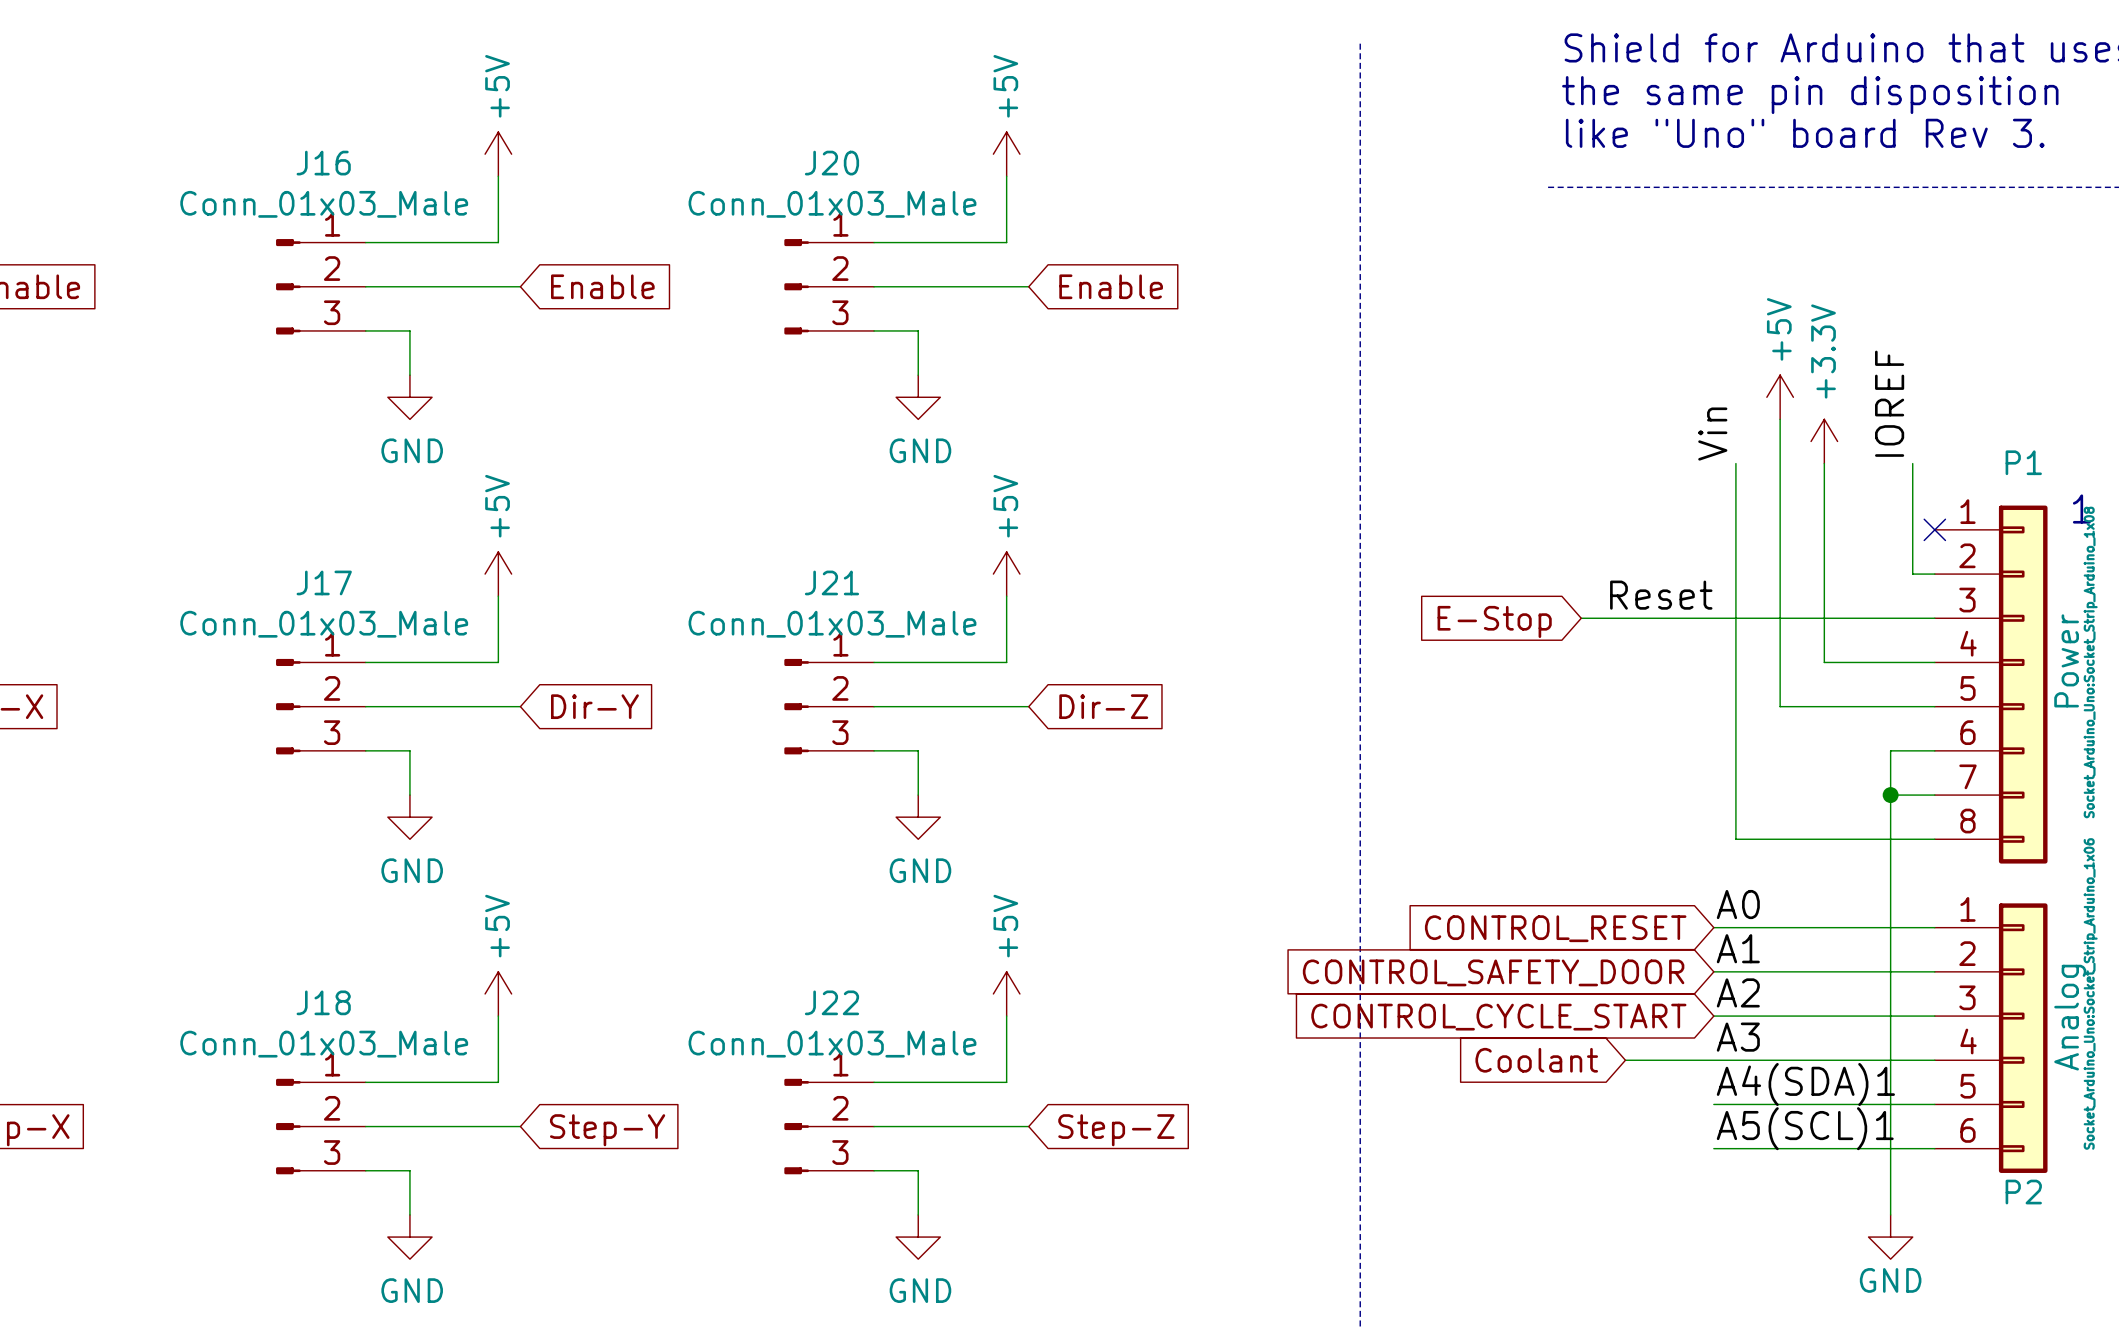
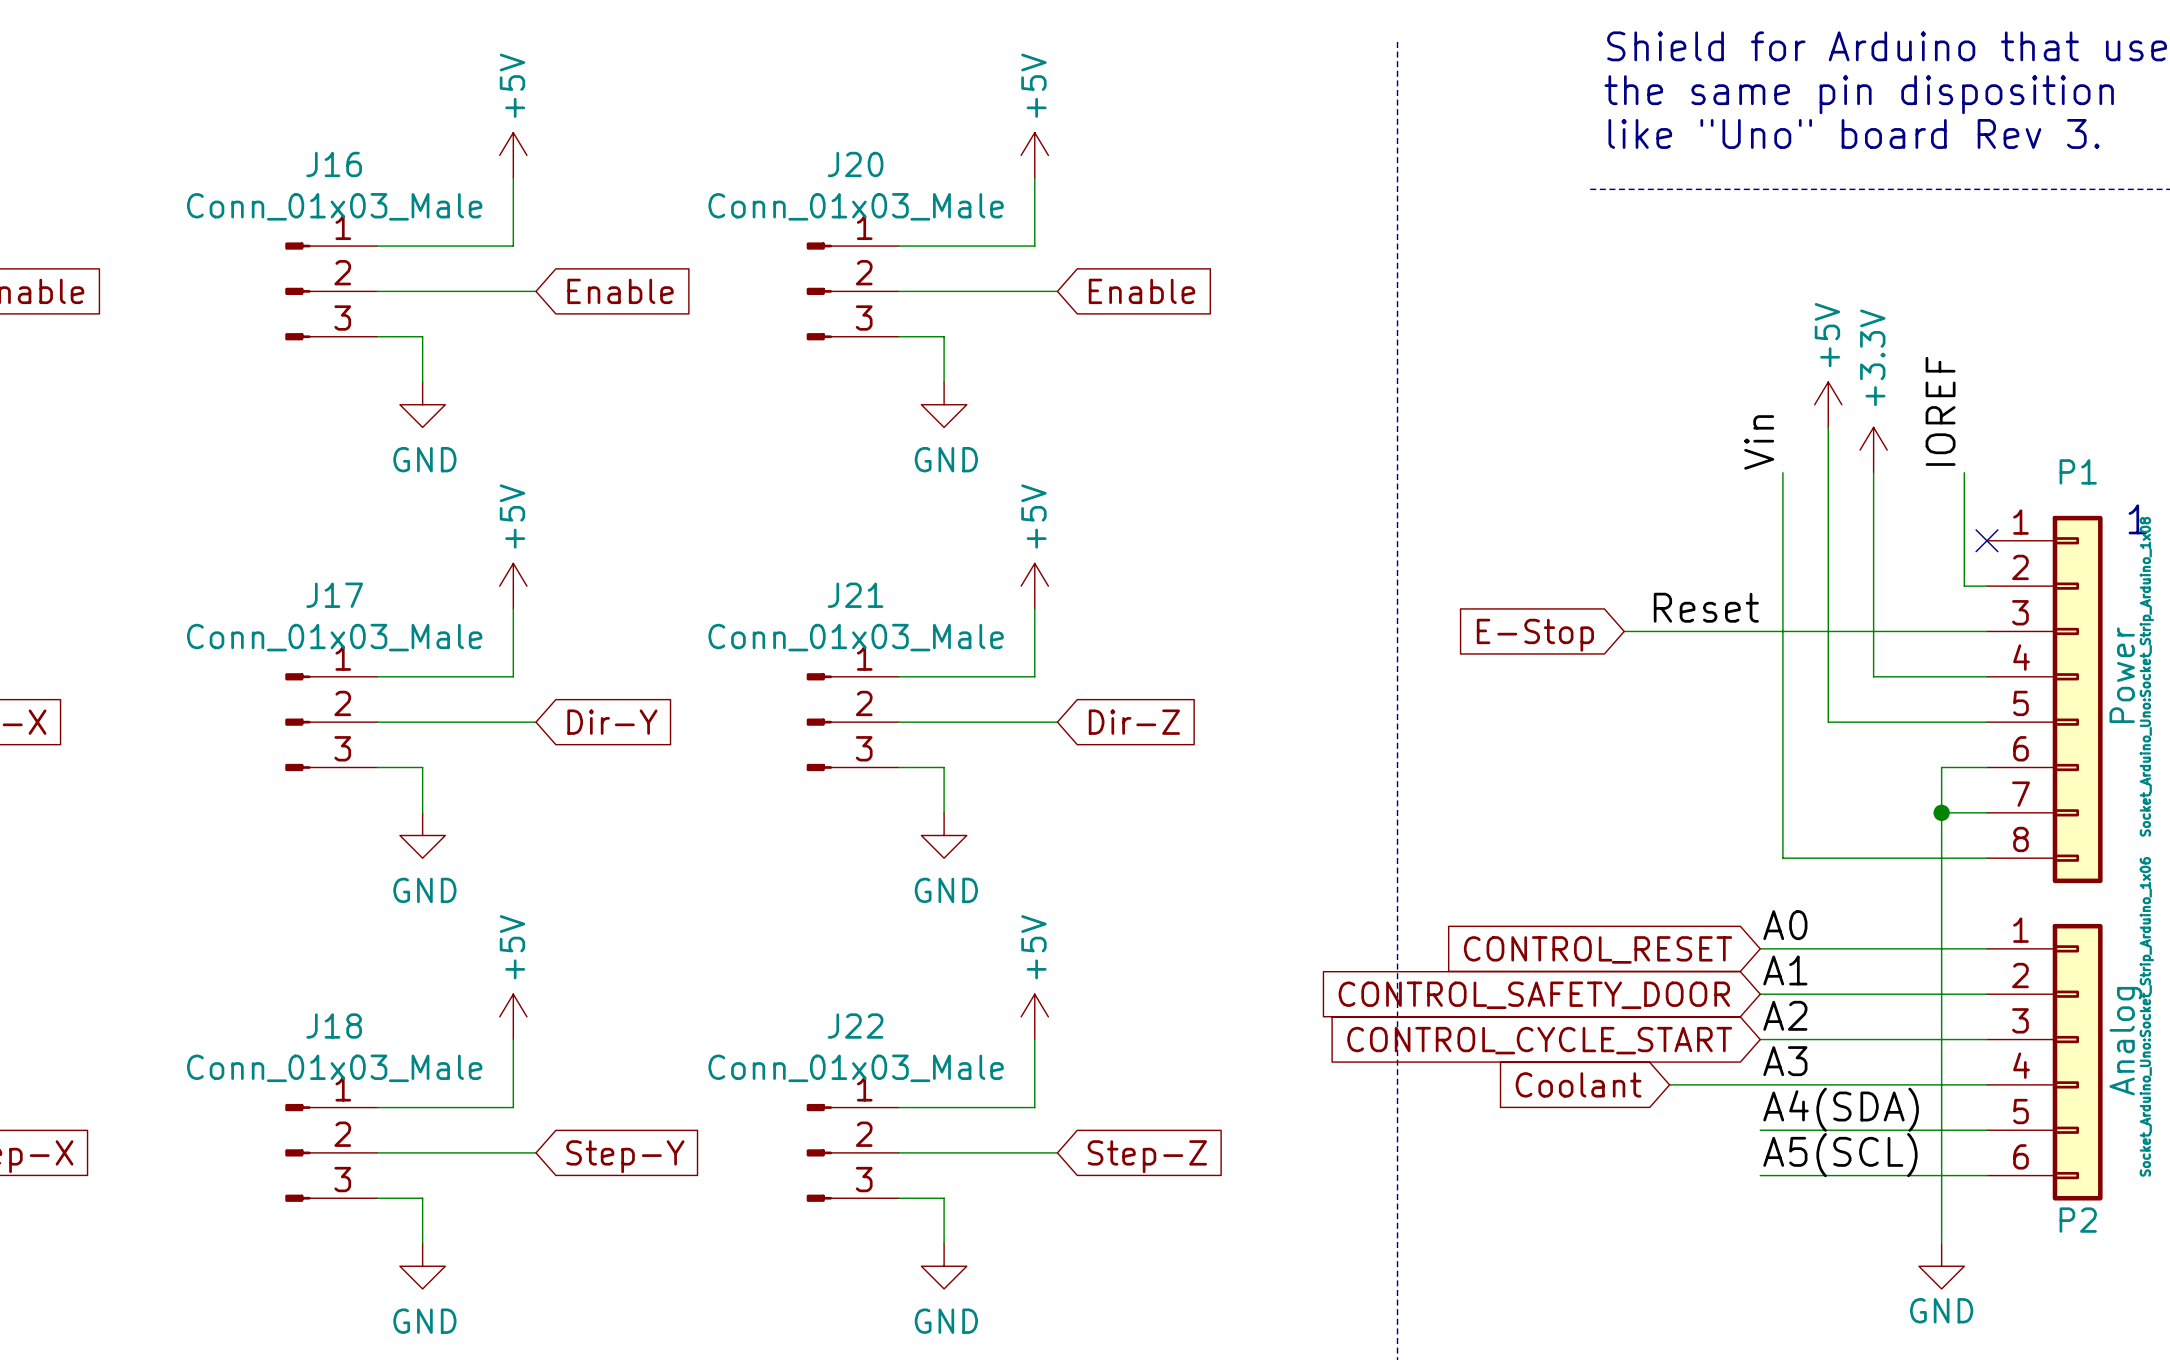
label: A4(SDA)1 (1805, 1084) -> A4(SDA) (1841, 1109)
label: A5(SCL)1 (1805, 1128) -> A5(SCL) (1840, 1155)

